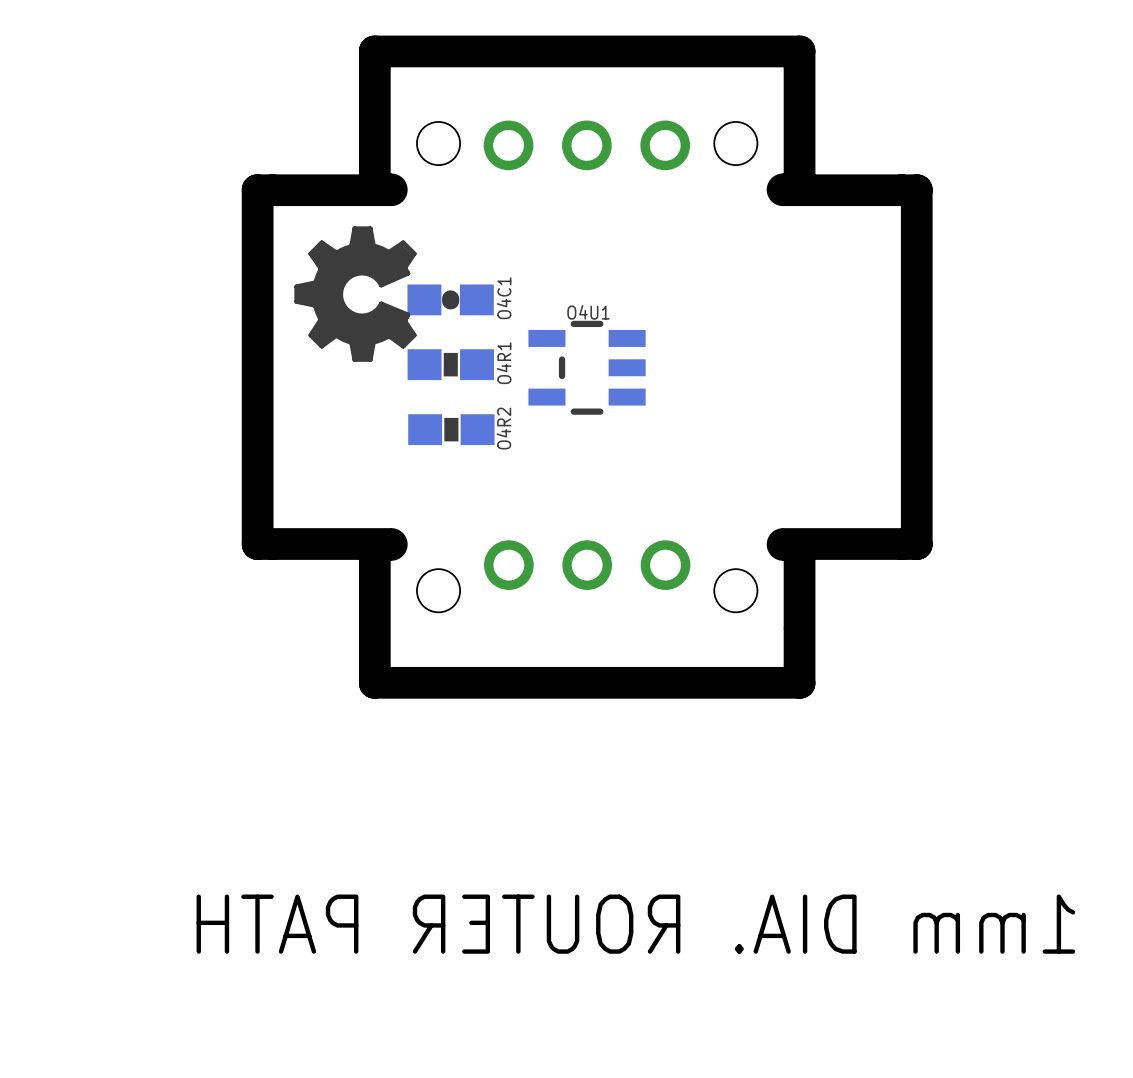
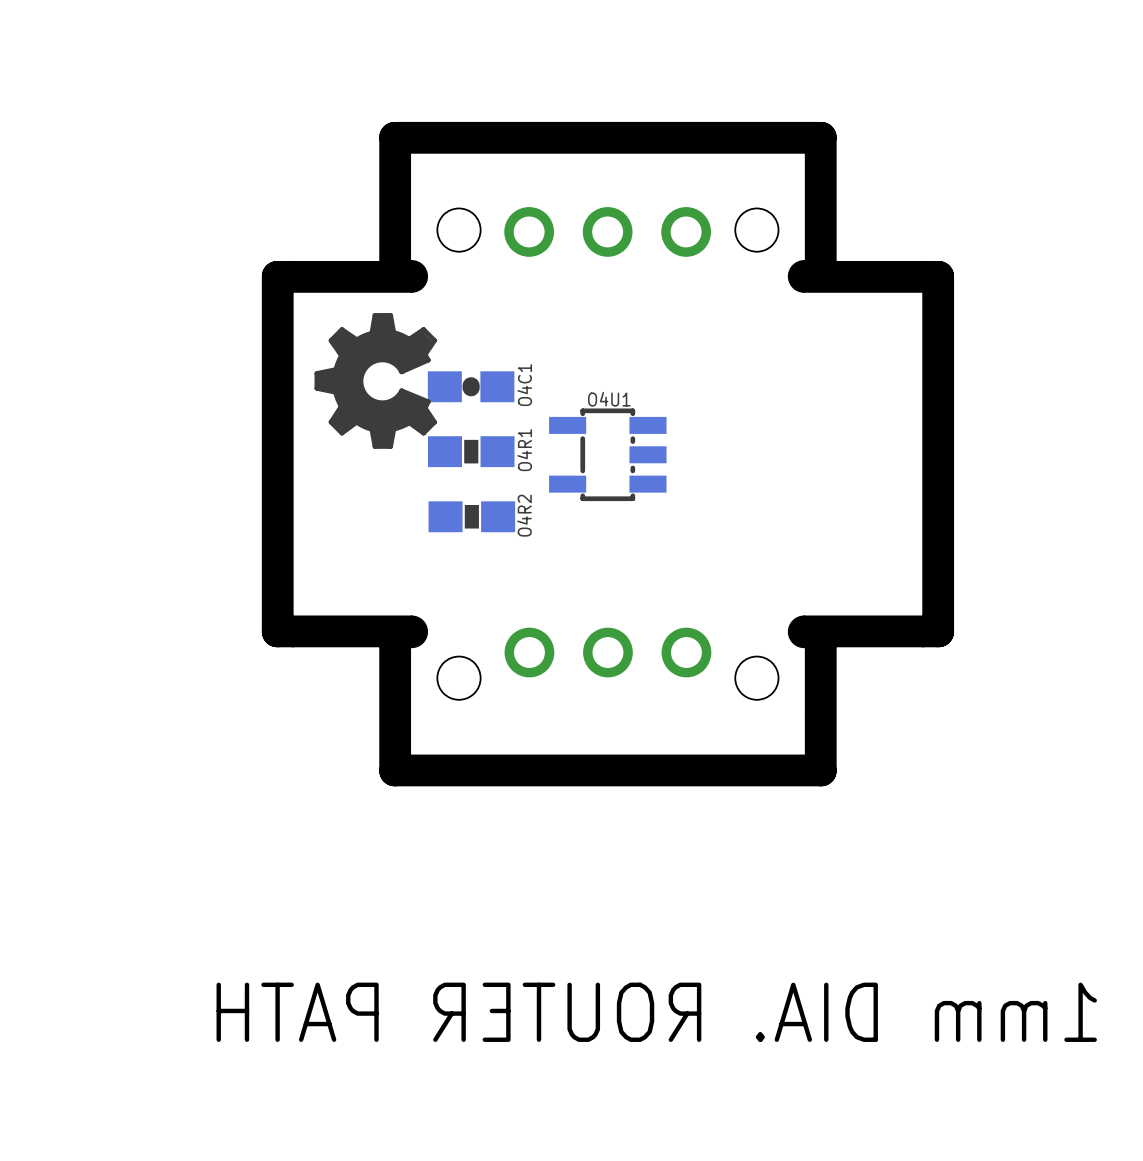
O4U1 footprint: [528, 320, 646, 415] -> [549, 408, 667, 502]

